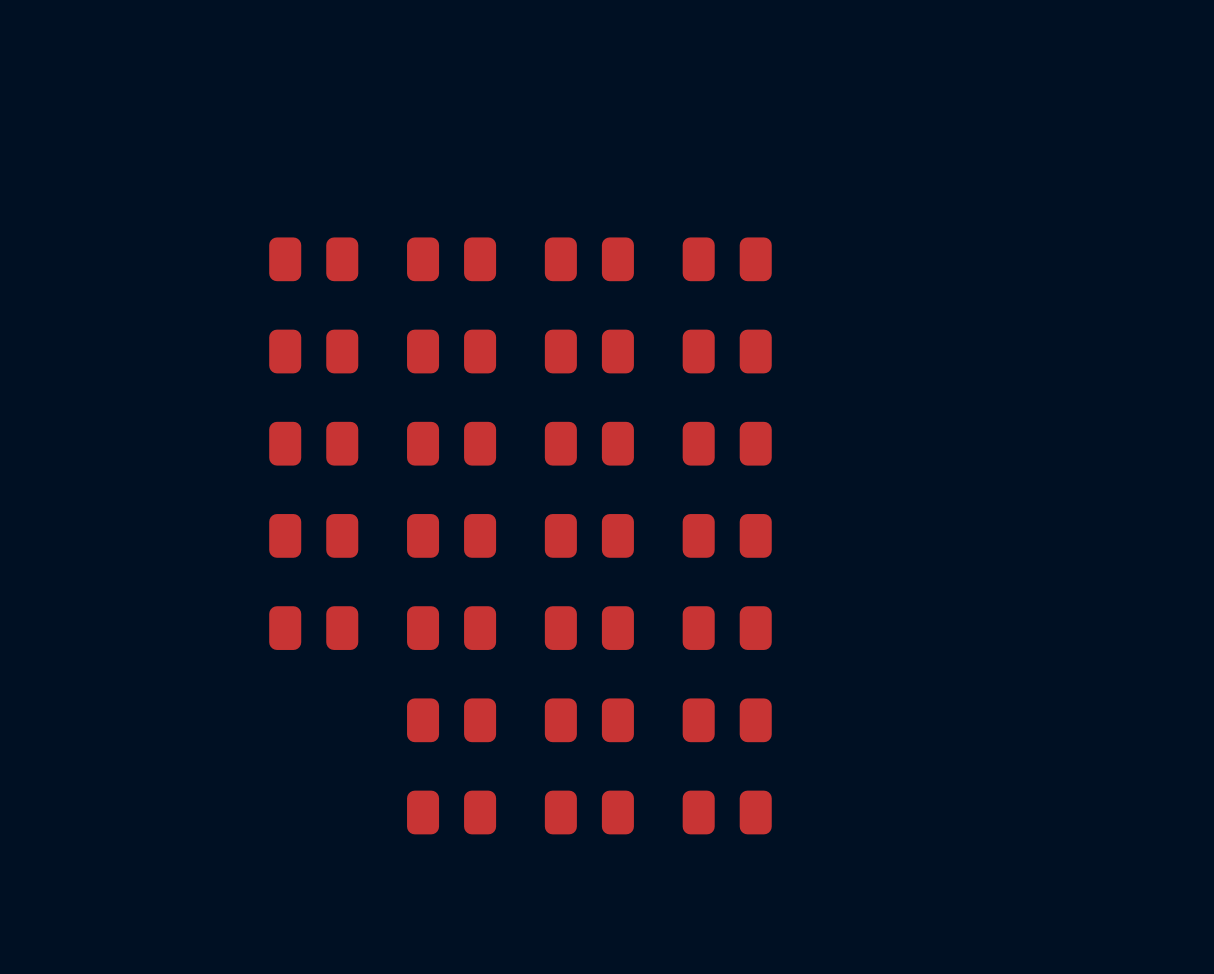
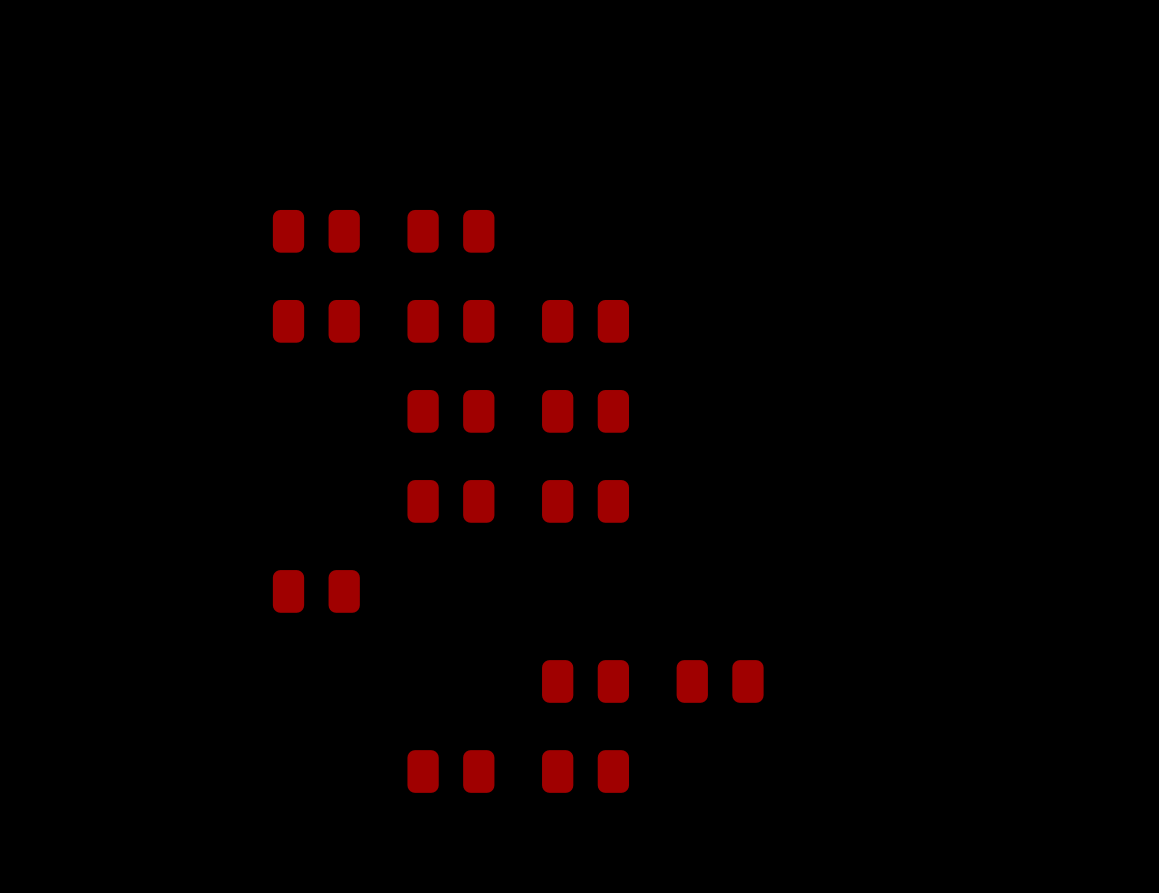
part: (589, 259) -> none
part: (727, 259) -> none
part: (727, 351) -> none
part: (313, 443) -> none
part: (727, 443) -> none
part: (313, 535) -> none
part: (727, 535) -> none
part: (451, 628) -> none
part: (589, 628) -> none
part: (727, 628) -> none
part: (451, 720) -> none
part: (727, 812) -> none

